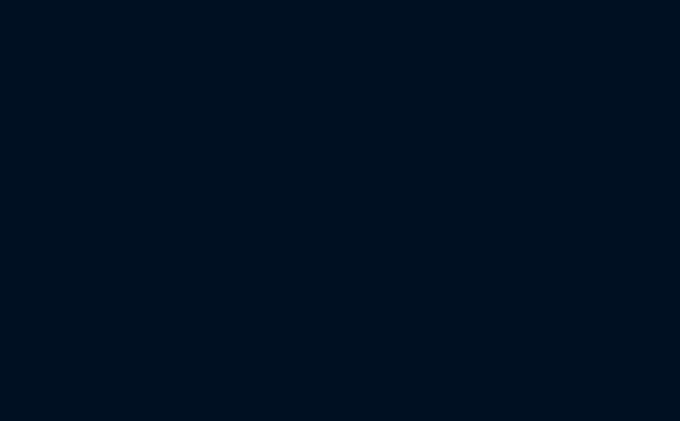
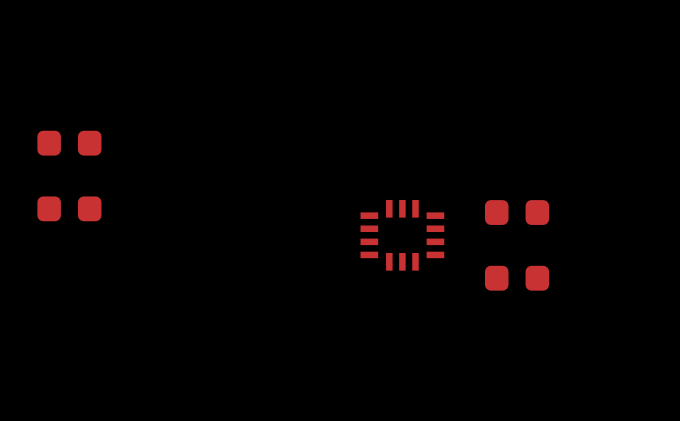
part: none -> (69, 143)
part: none -> (69, 208)
part: none -> (517, 212)
part: none -> (402, 235)
part: none -> (517, 278)

